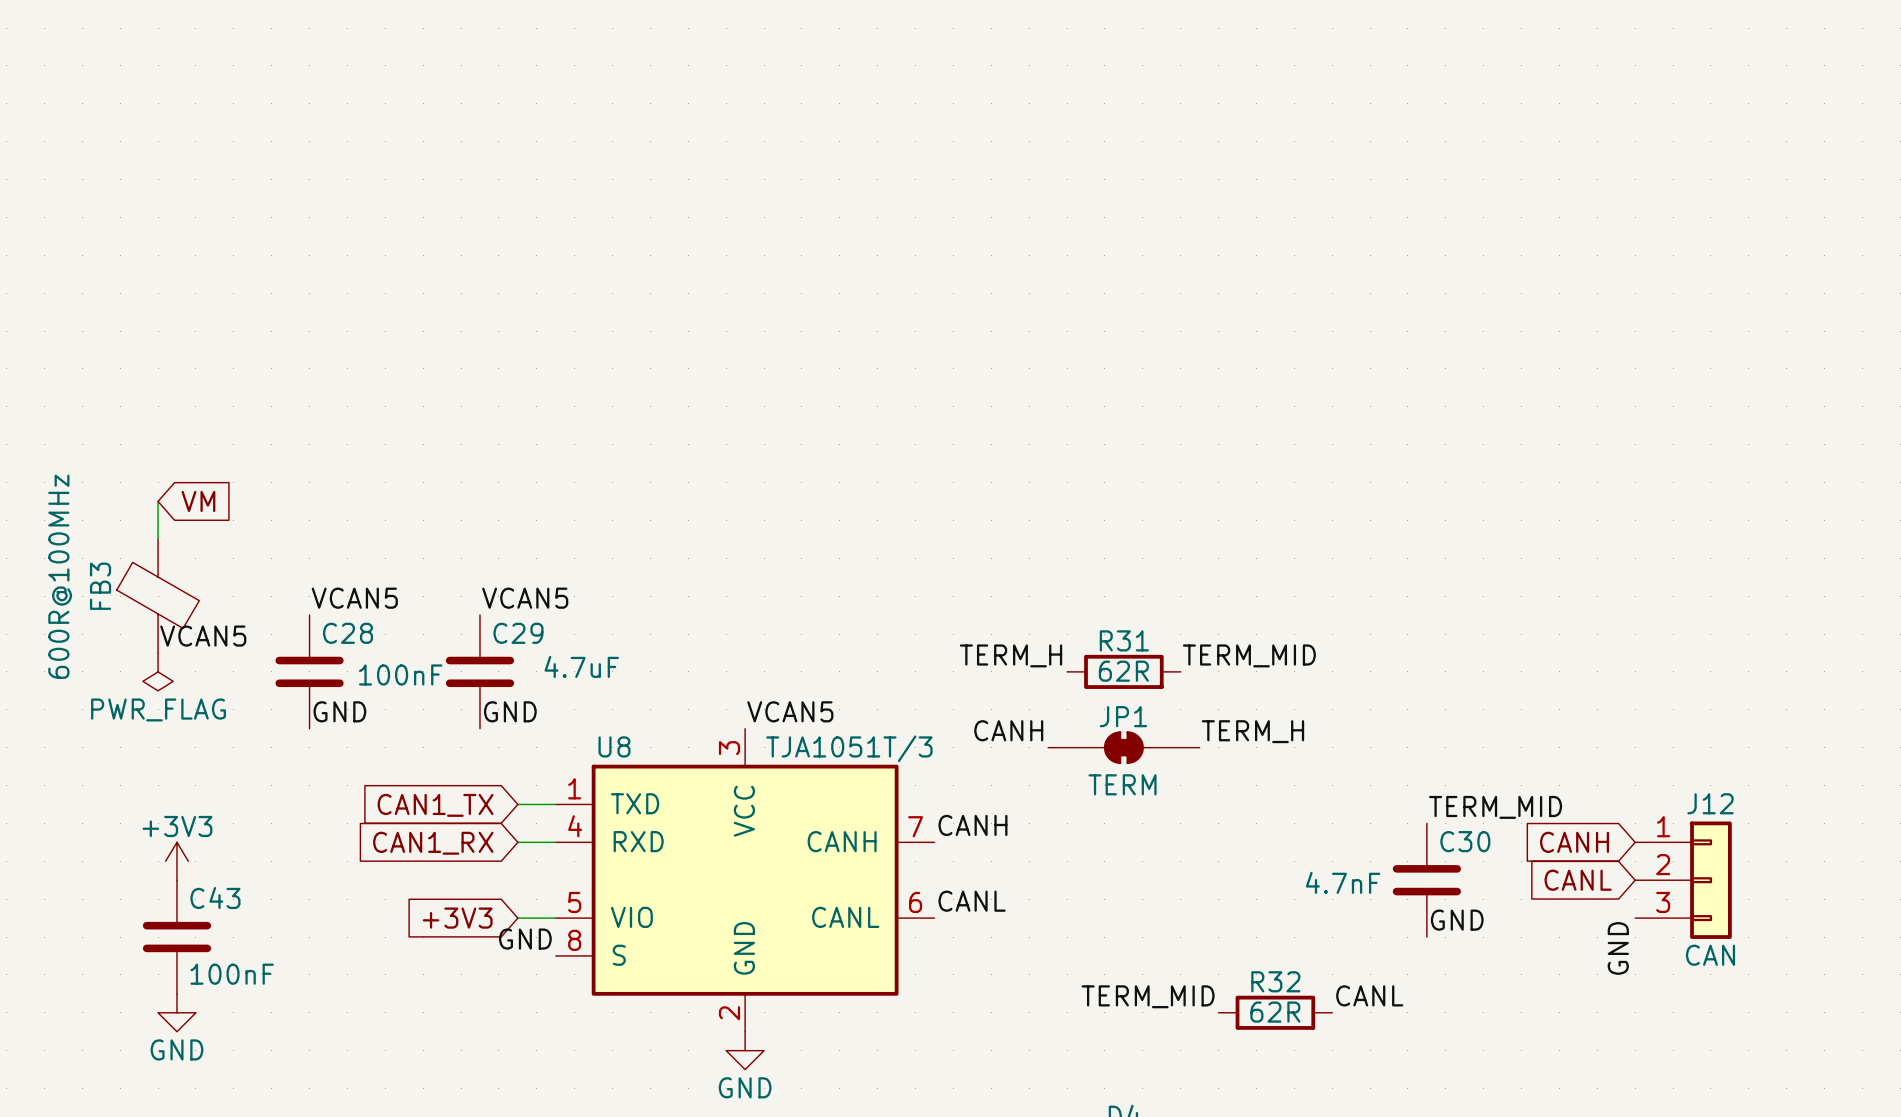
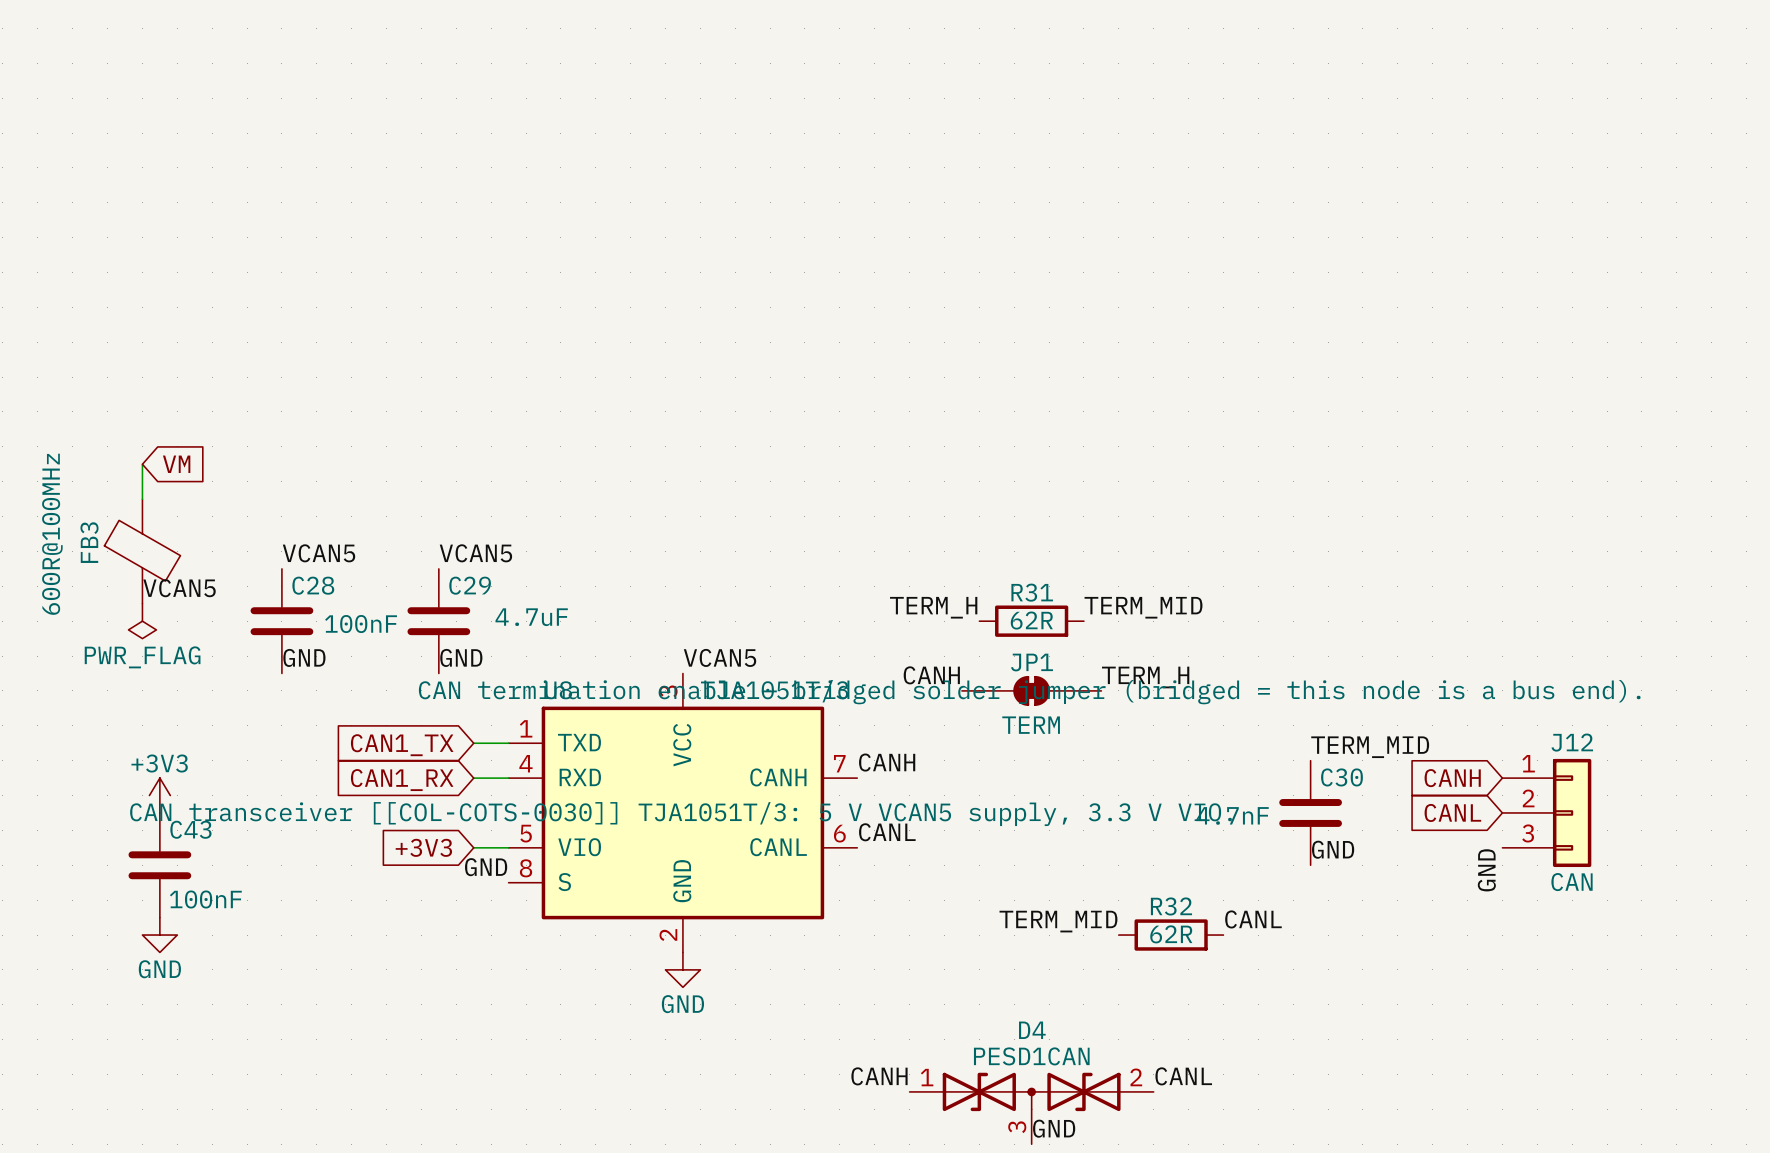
JP1 text: none -> CAN termination enable — bridged solder jumper (bridged = this node is a bus end). (1029, 692)
U8 text: none -> CAN transceiver [[COL-COTS-0030]] TJA1051T/3: 5 V VCAN5 supply, 3.3 V VIO. (680, 814)

